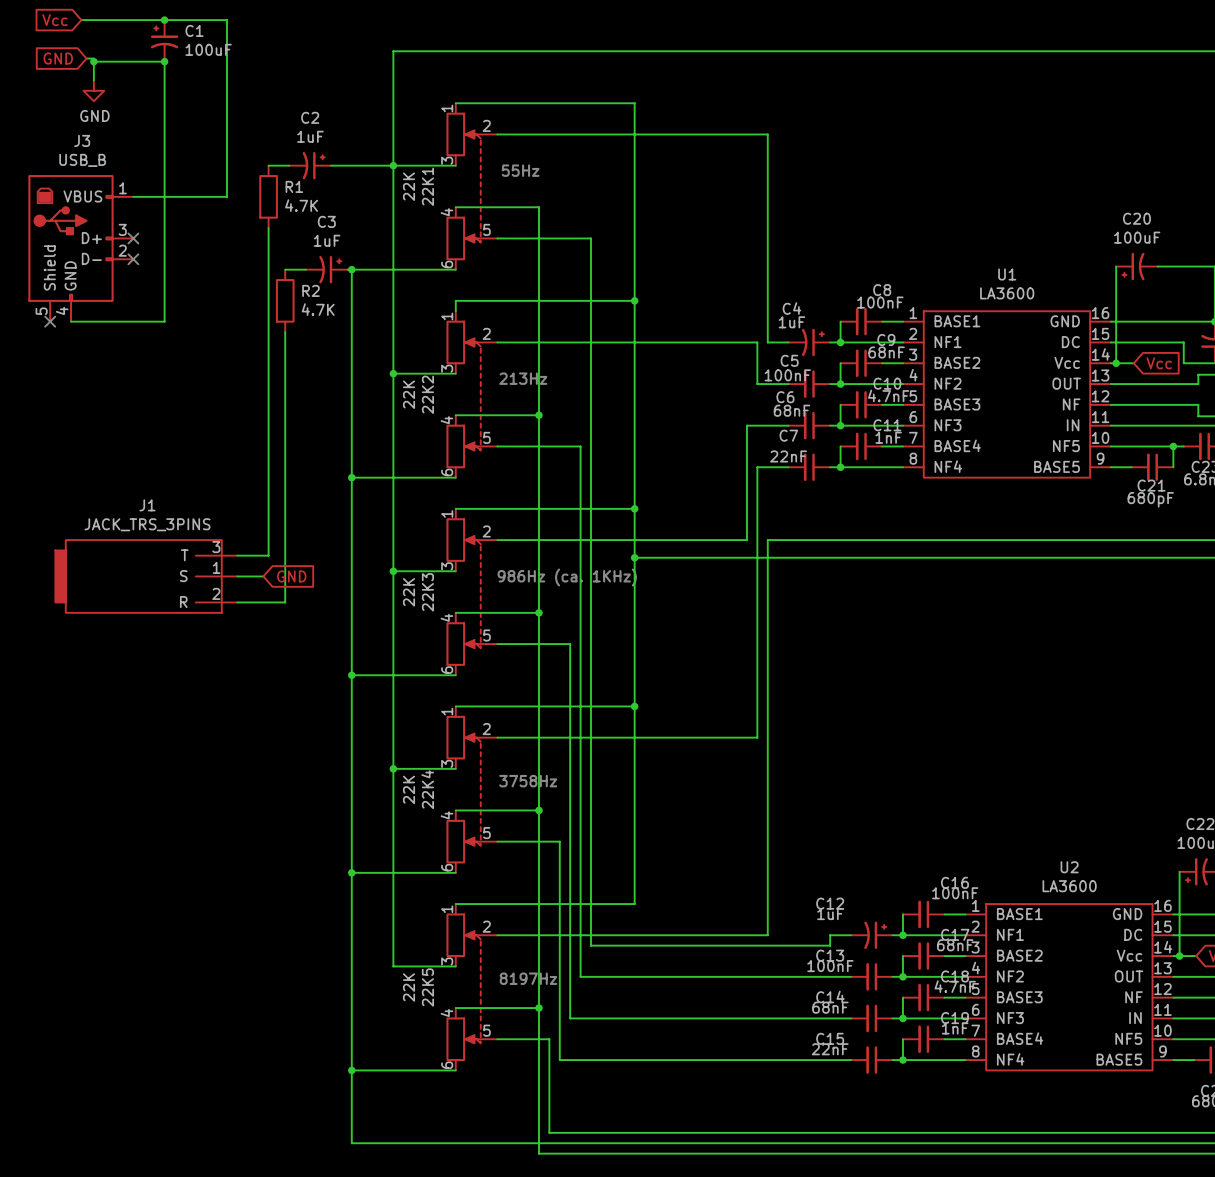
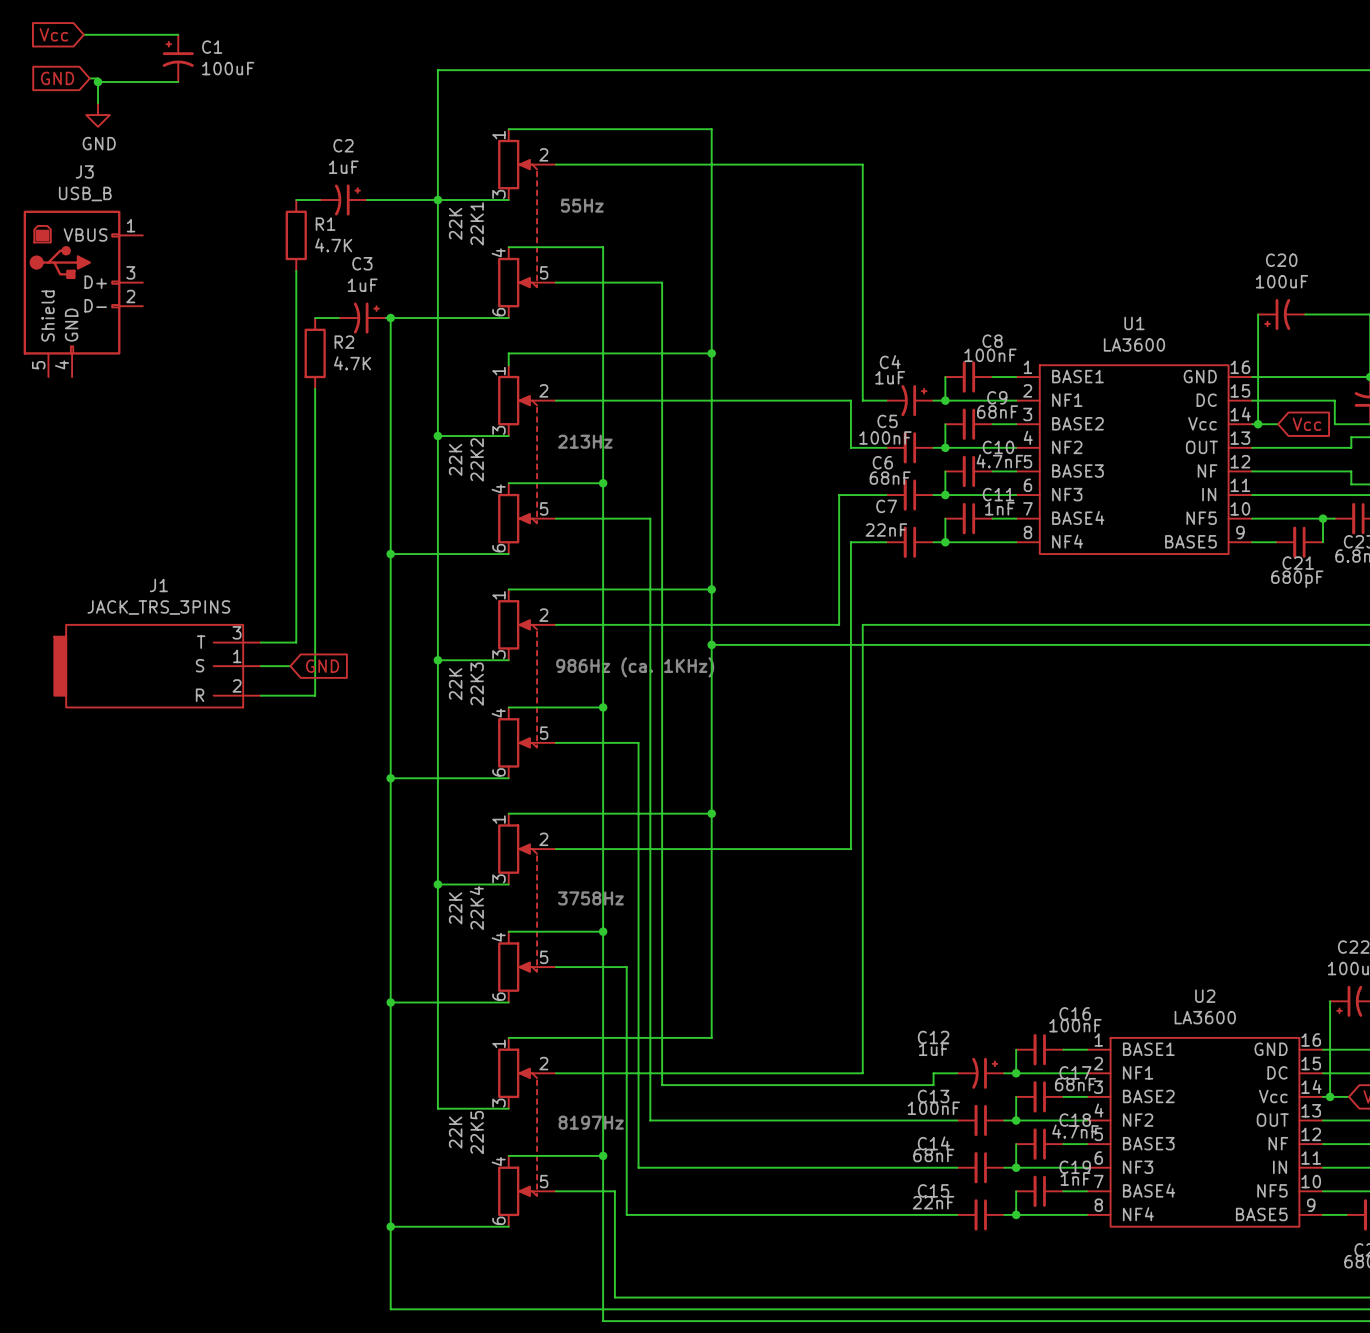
wire: (164, 20) (226, 20) (226, 196) (133, 196) -> none
junction: (164, 20) -> none
wire: (164, 61) (164, 321) (70, 321) -> none
junction: (164, 61) -> none
no-connect mark: (133, 238) -> none
no-connect mark: (133, 259) -> none
no-connect mark: (50, 321) -> none

